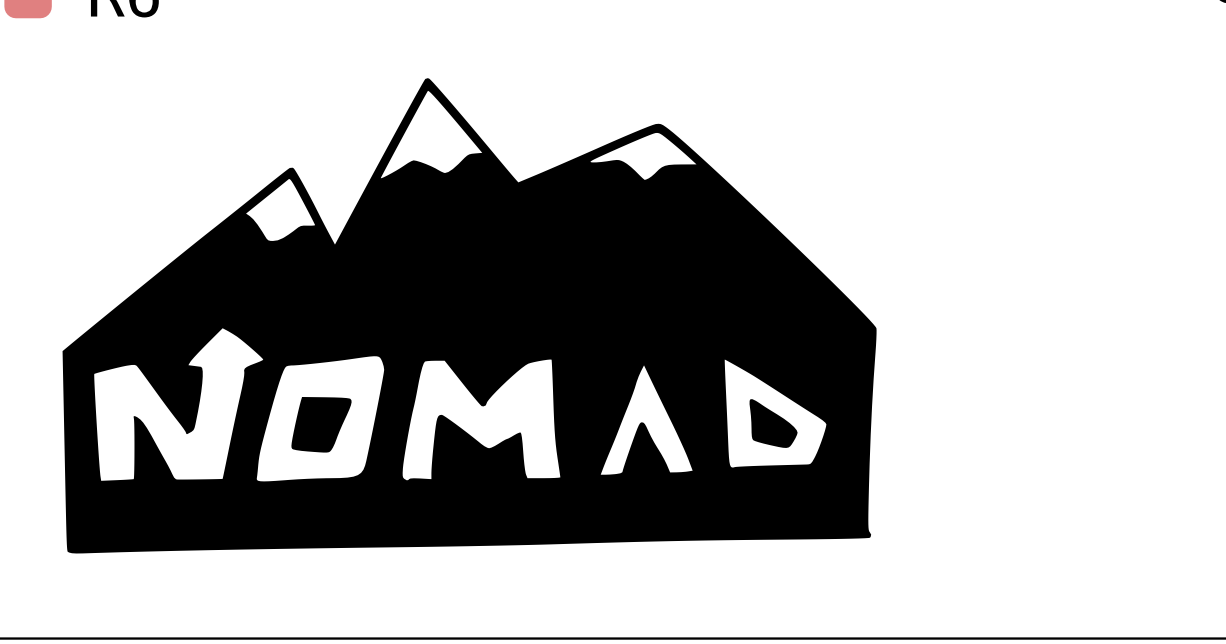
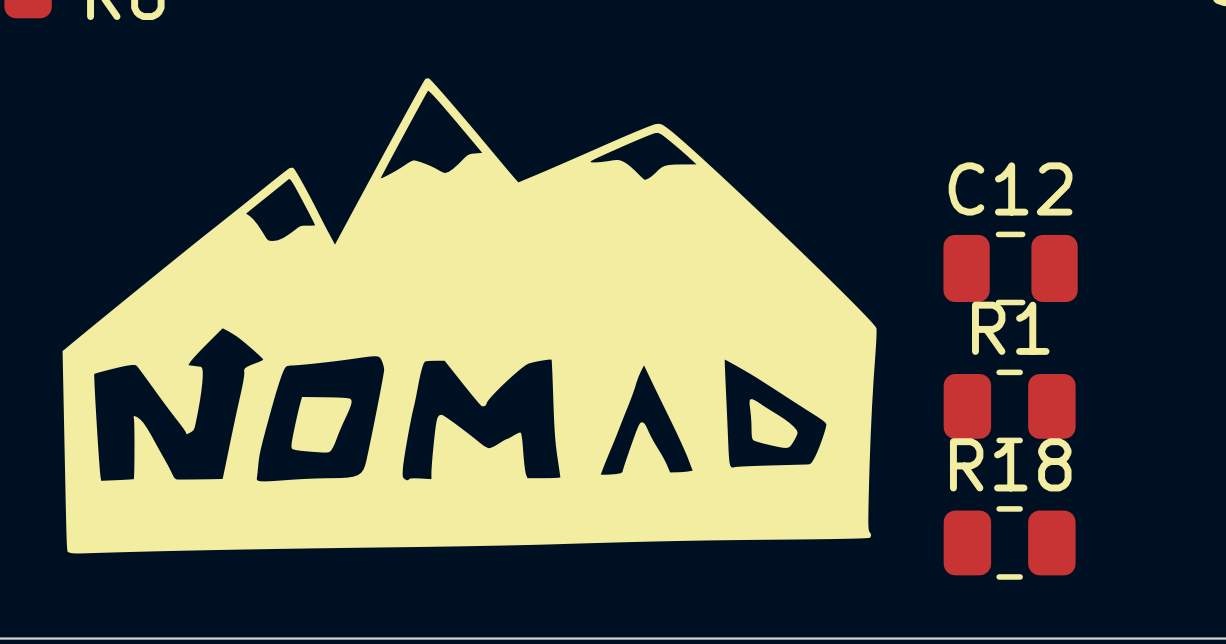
C12: none -> (1010, 268)
R1: none -> (1009, 406)
R18: none -> (1009, 542)

